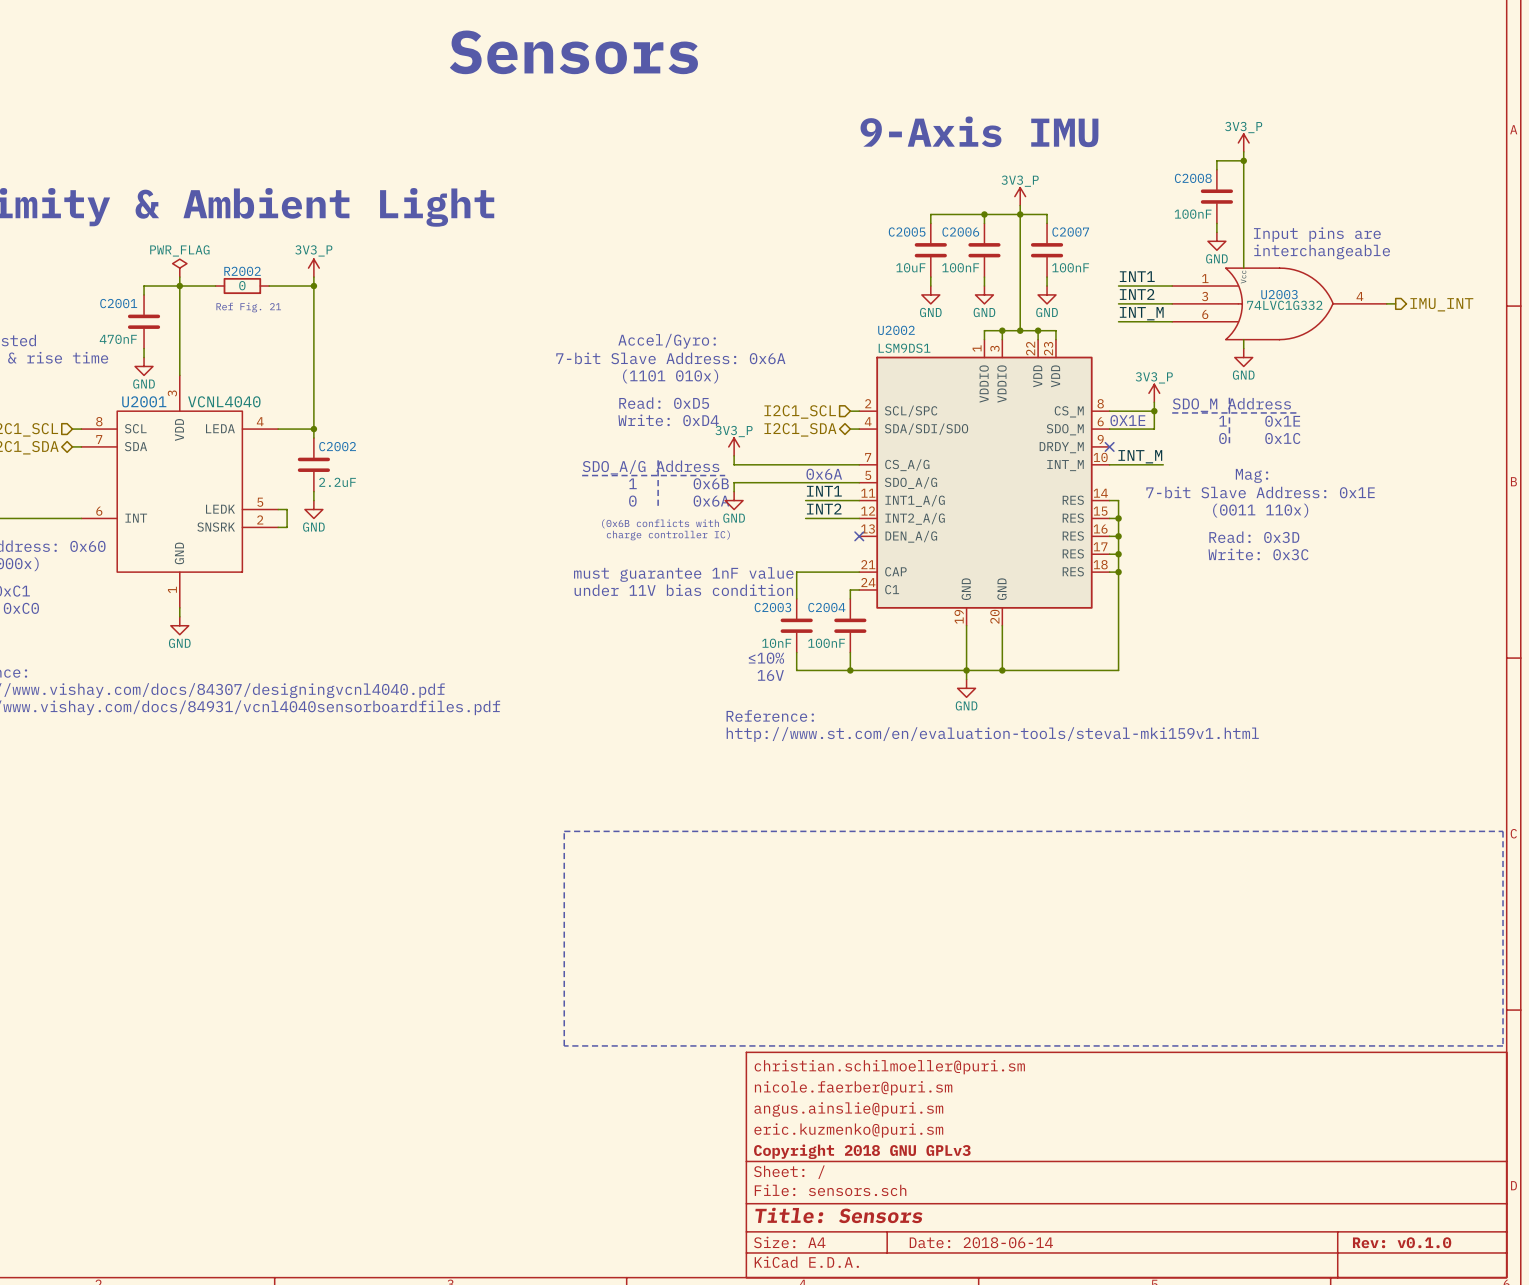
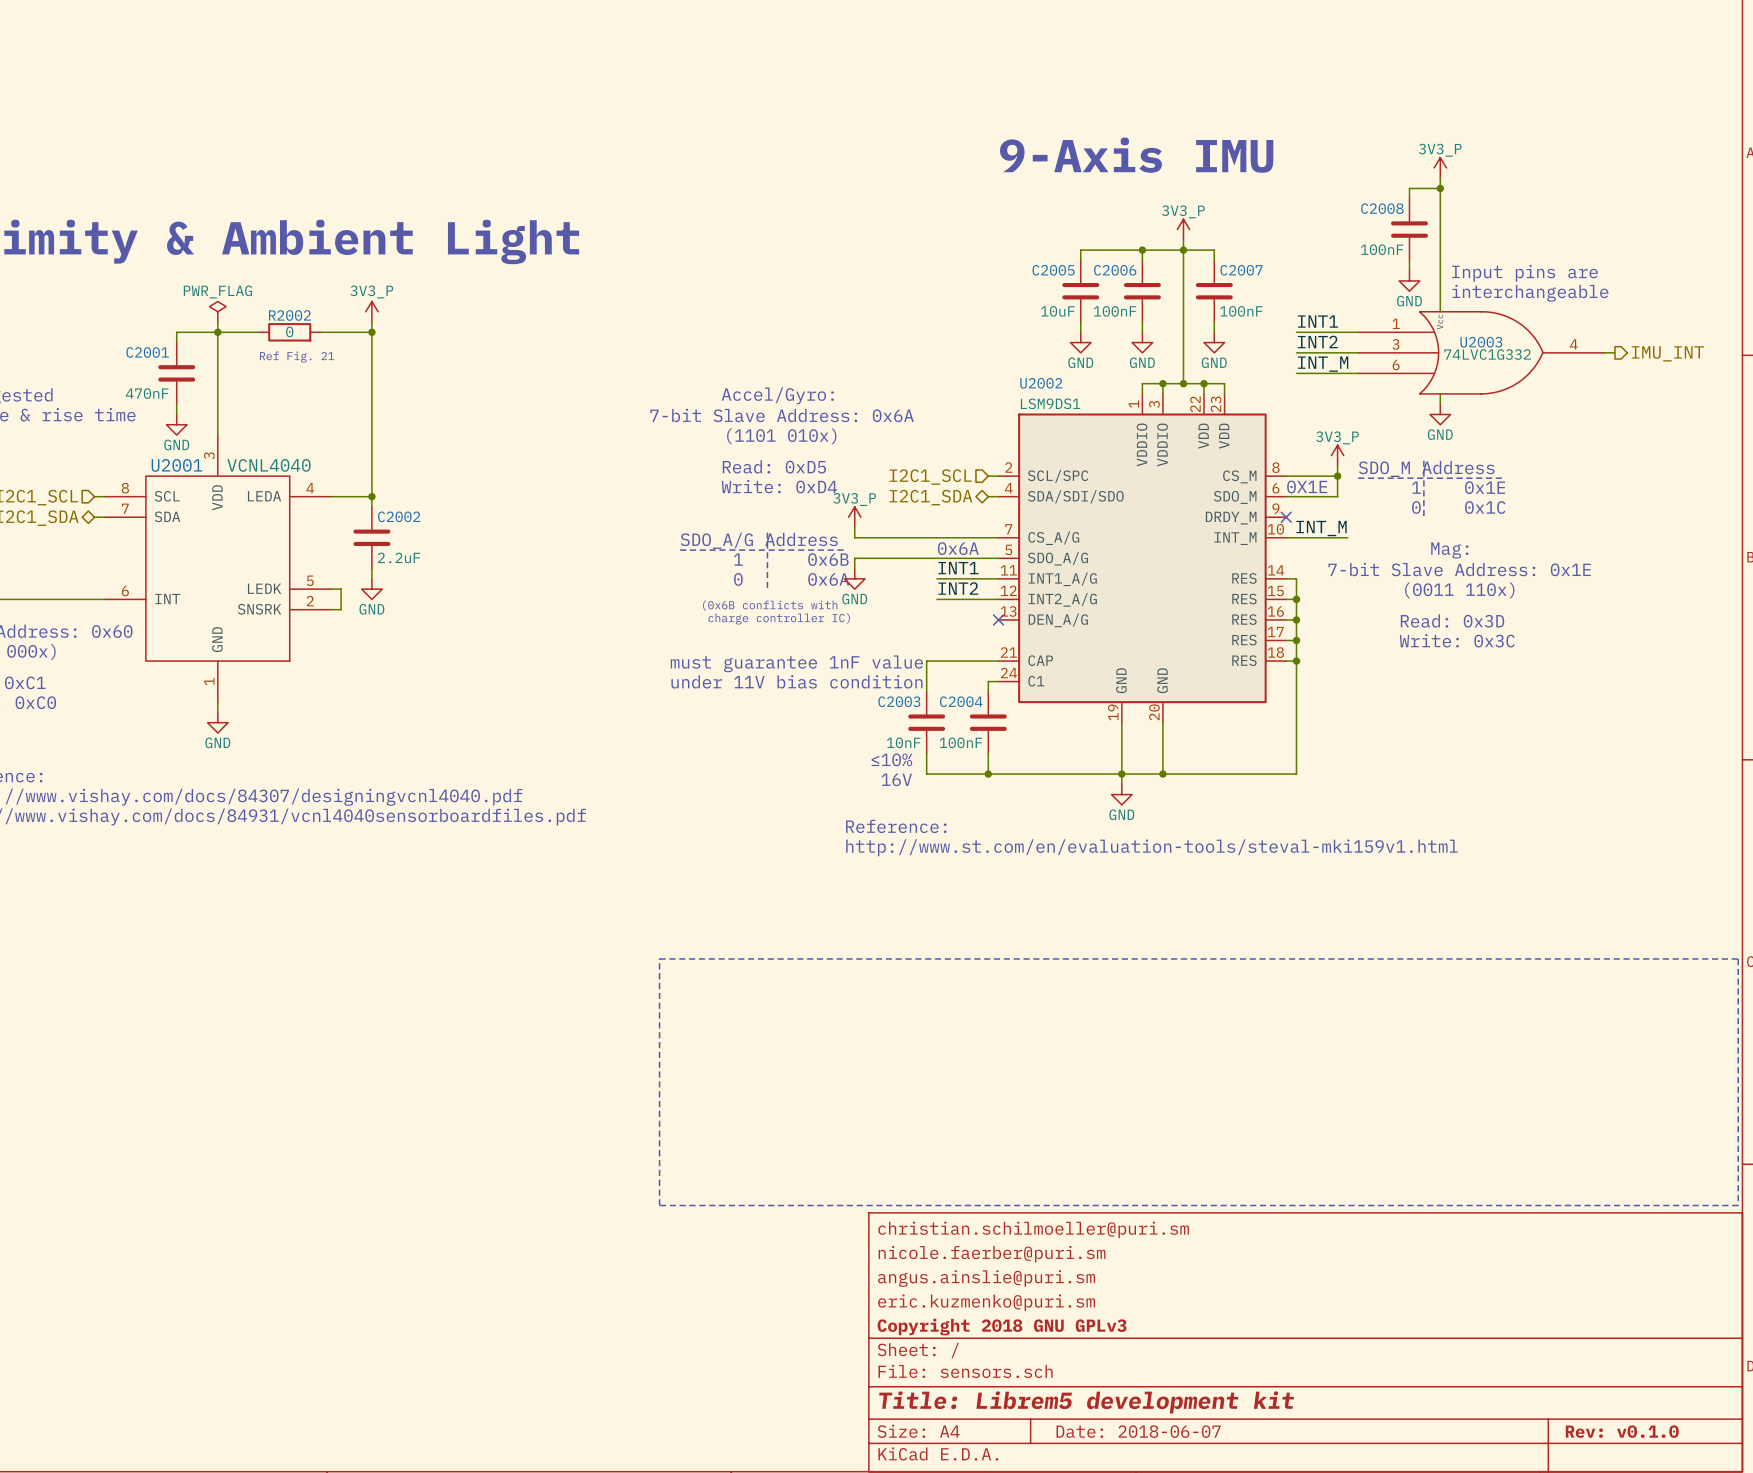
text: Sensors (573, 52) -> none
title block: Title: Sensors (838, 1215) -> Title: Librem5 development kit (1086, 1402)
title block: Date: 2018-06-14 (981, 1242) -> Date: 2018-06-07 (1138, 1431)

